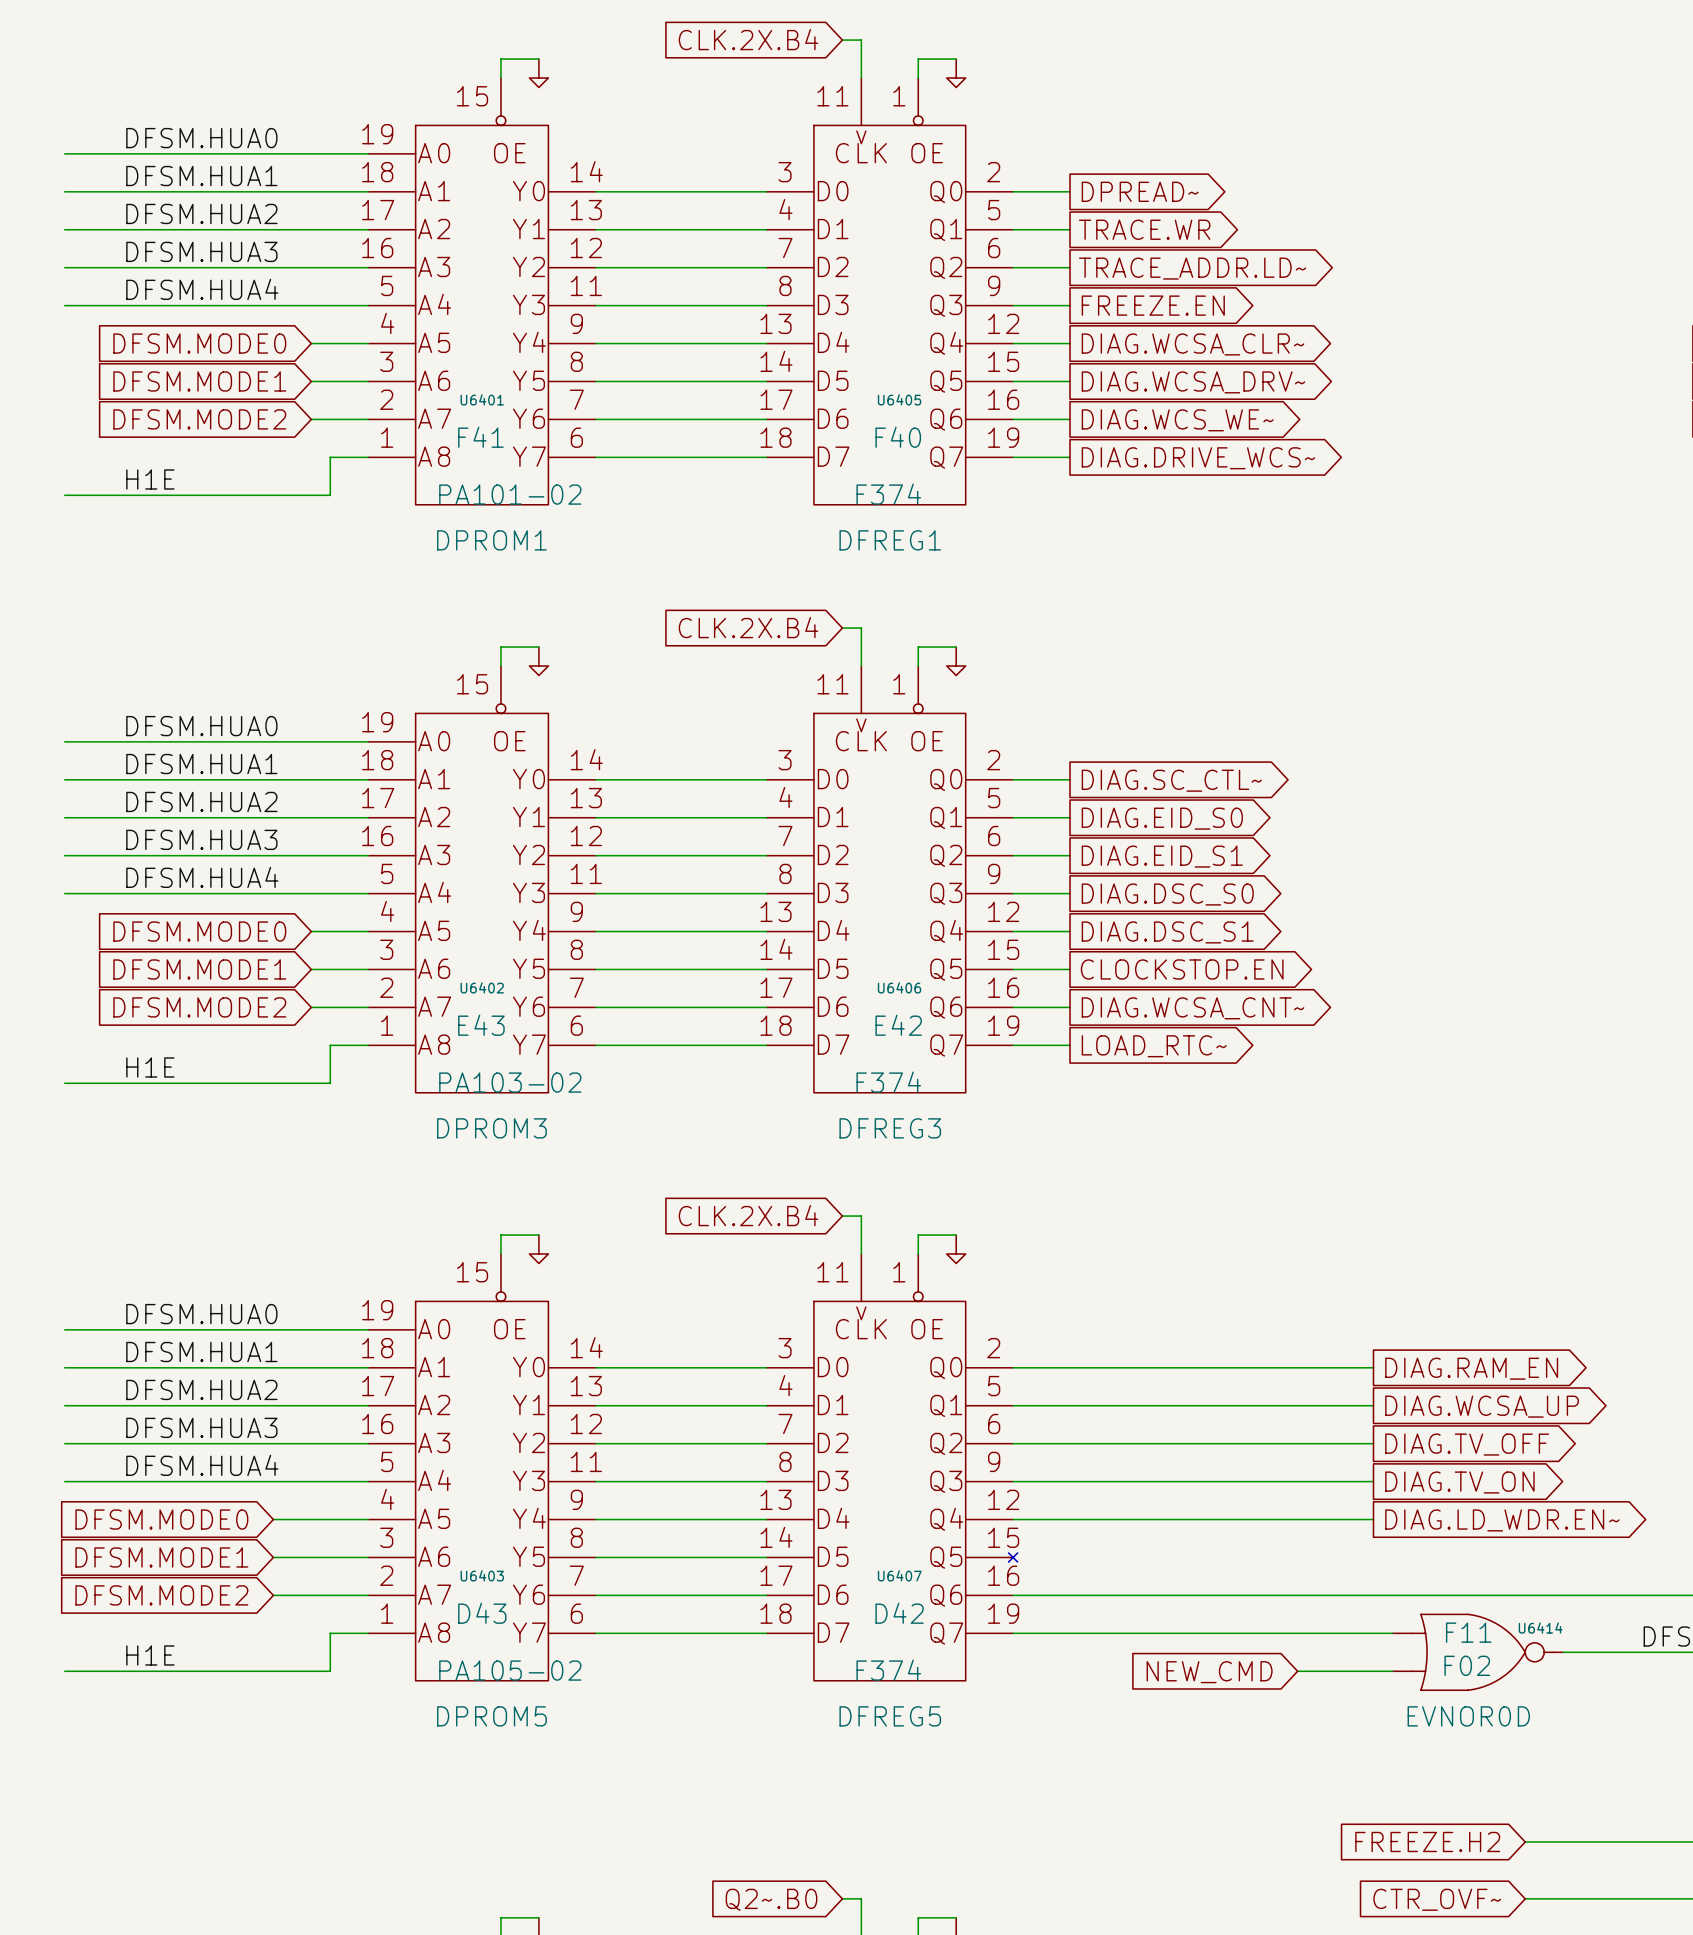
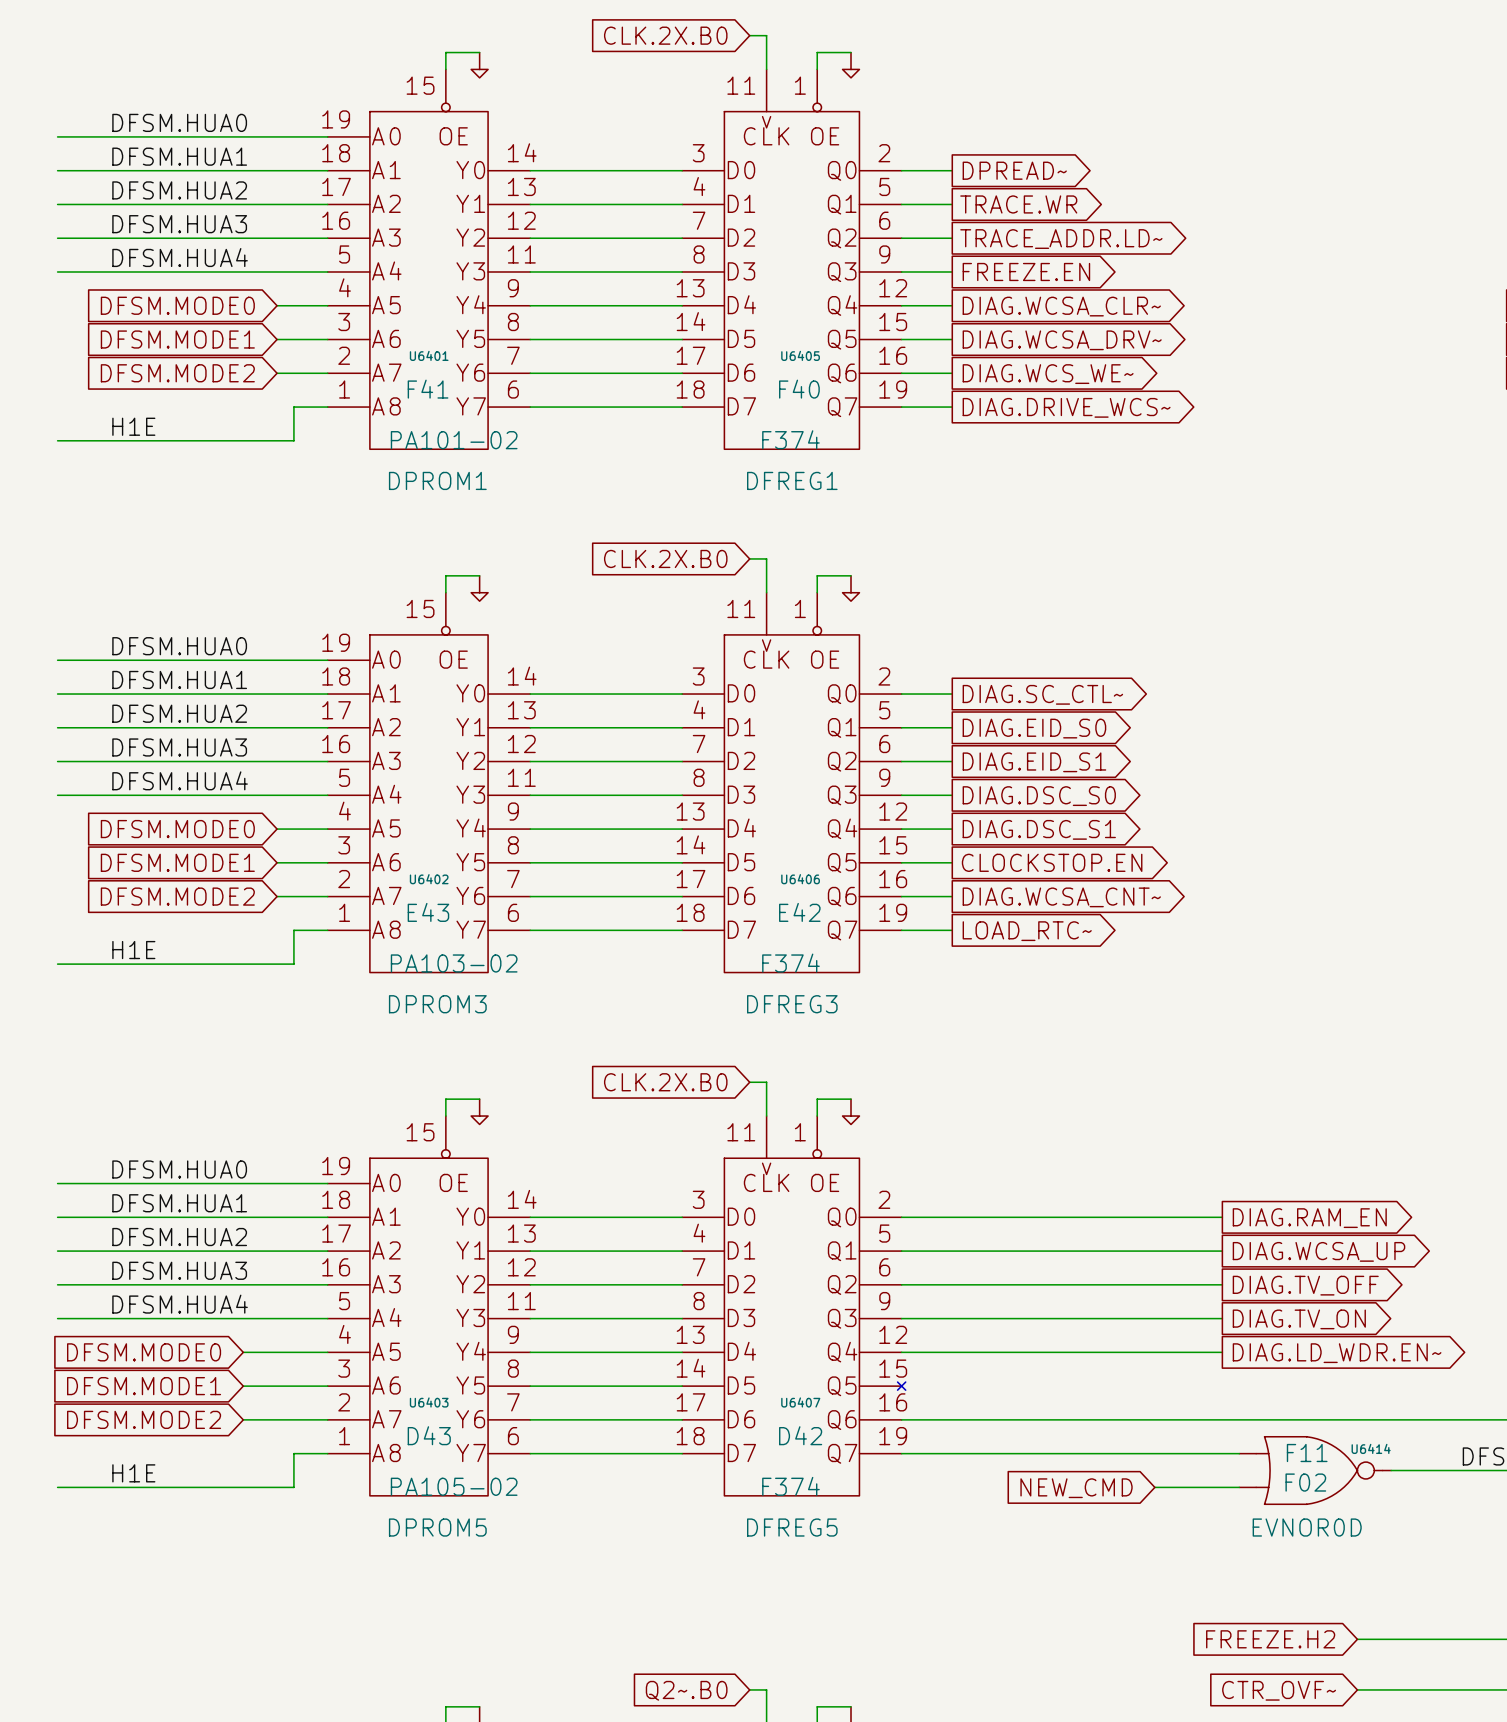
global label: CLK.2X.B4 (748, 39) -> CLK.2X.B0 (665, 35)
global label: CLK.2X.B4 (748, 627) -> CLK.2X.B0 (665, 558)
global label: CLK.2X.B4 (748, 1215) -> CLK.2X.B0 (665, 1082)

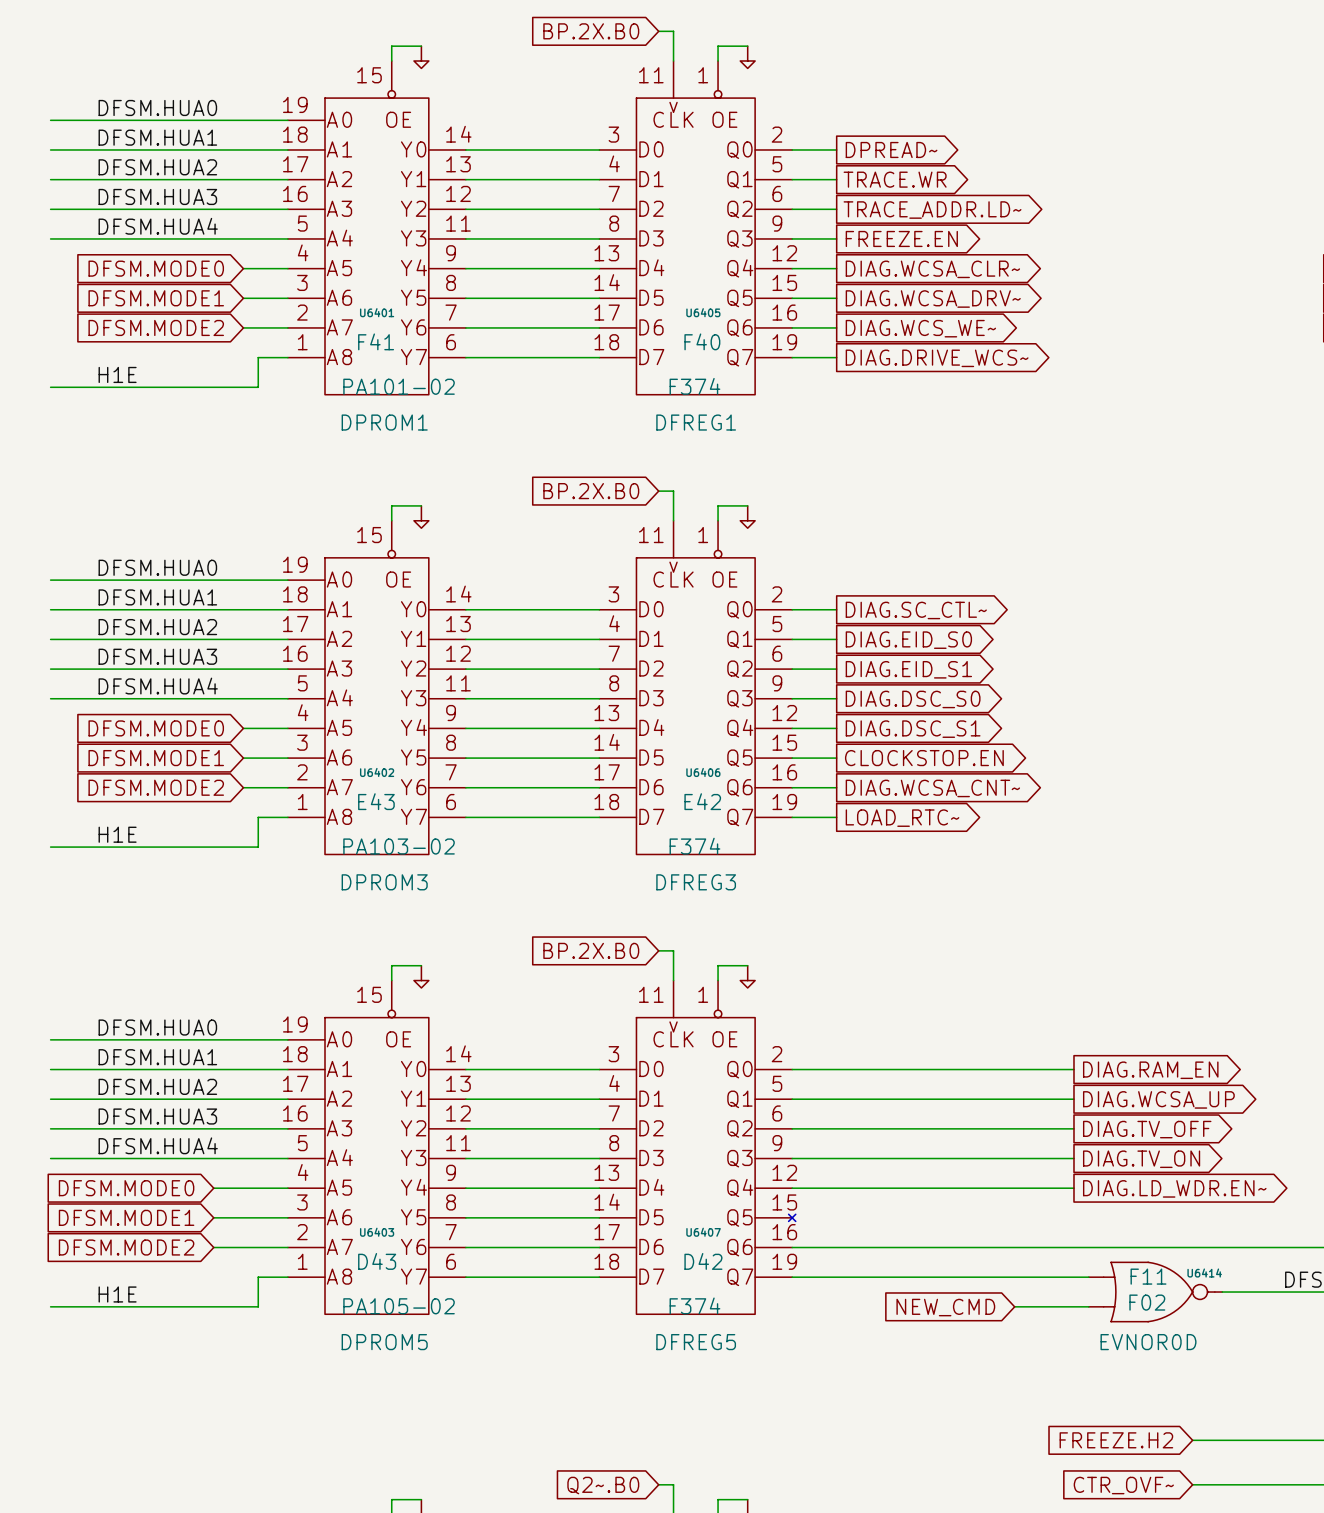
global label: CLK.2X.B0 (665, 35) -> BP.2X.B0 (591, 31)
global label: CLK.2X.B0 (665, 558) -> BP.2X.B0 (591, 491)
global label: CLK.2X.B0 (665, 1082) -> BP.2X.B0 (591, 950)

